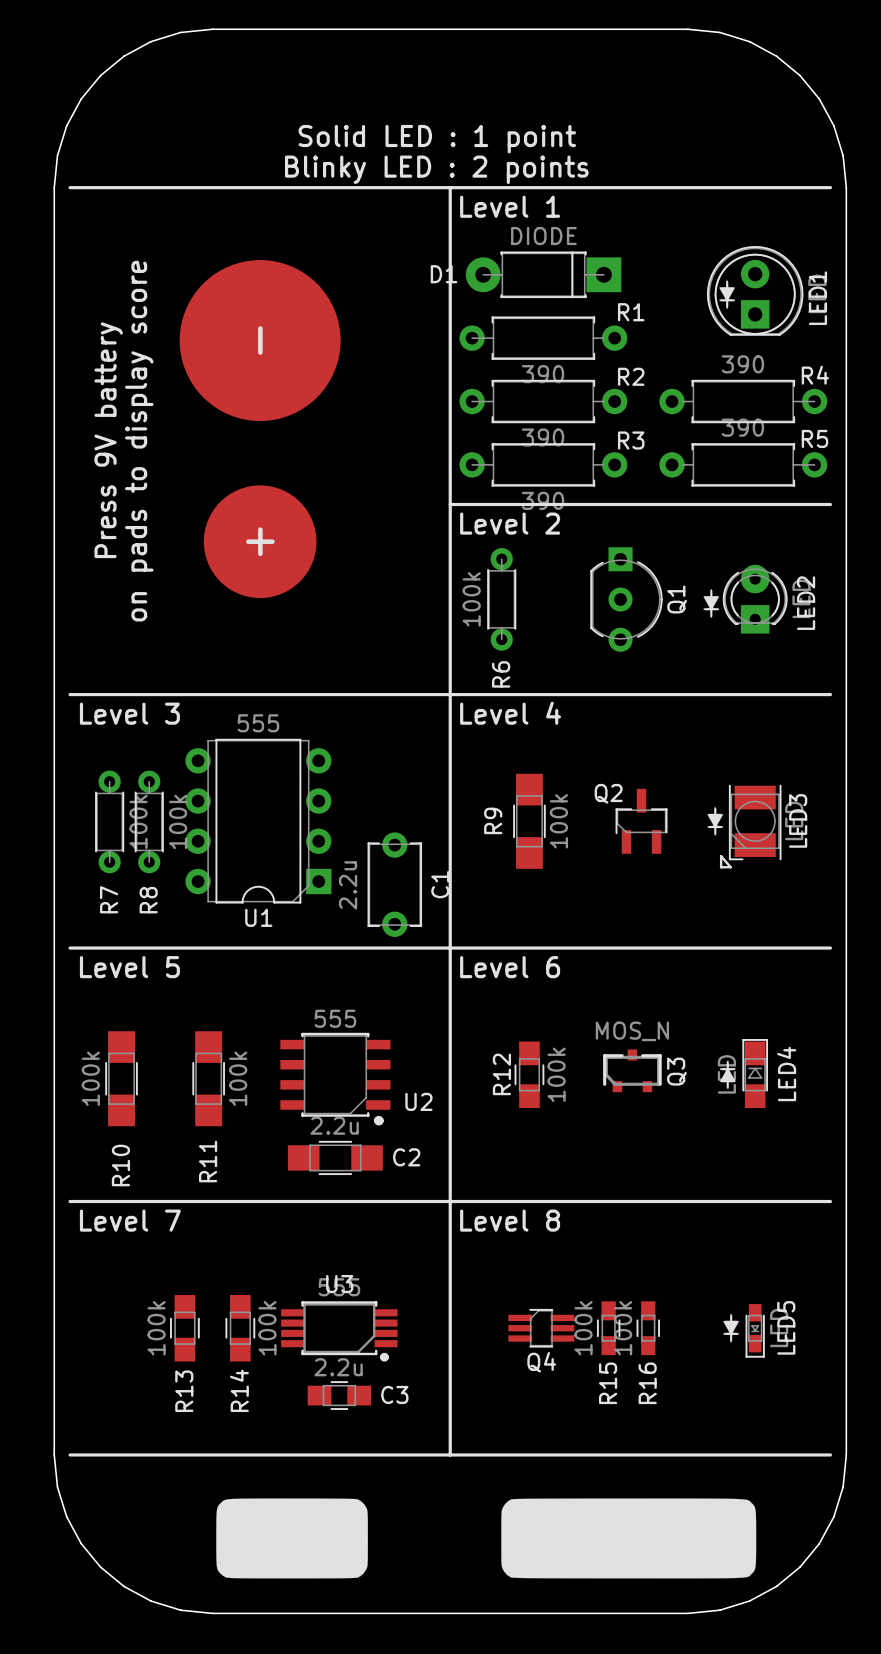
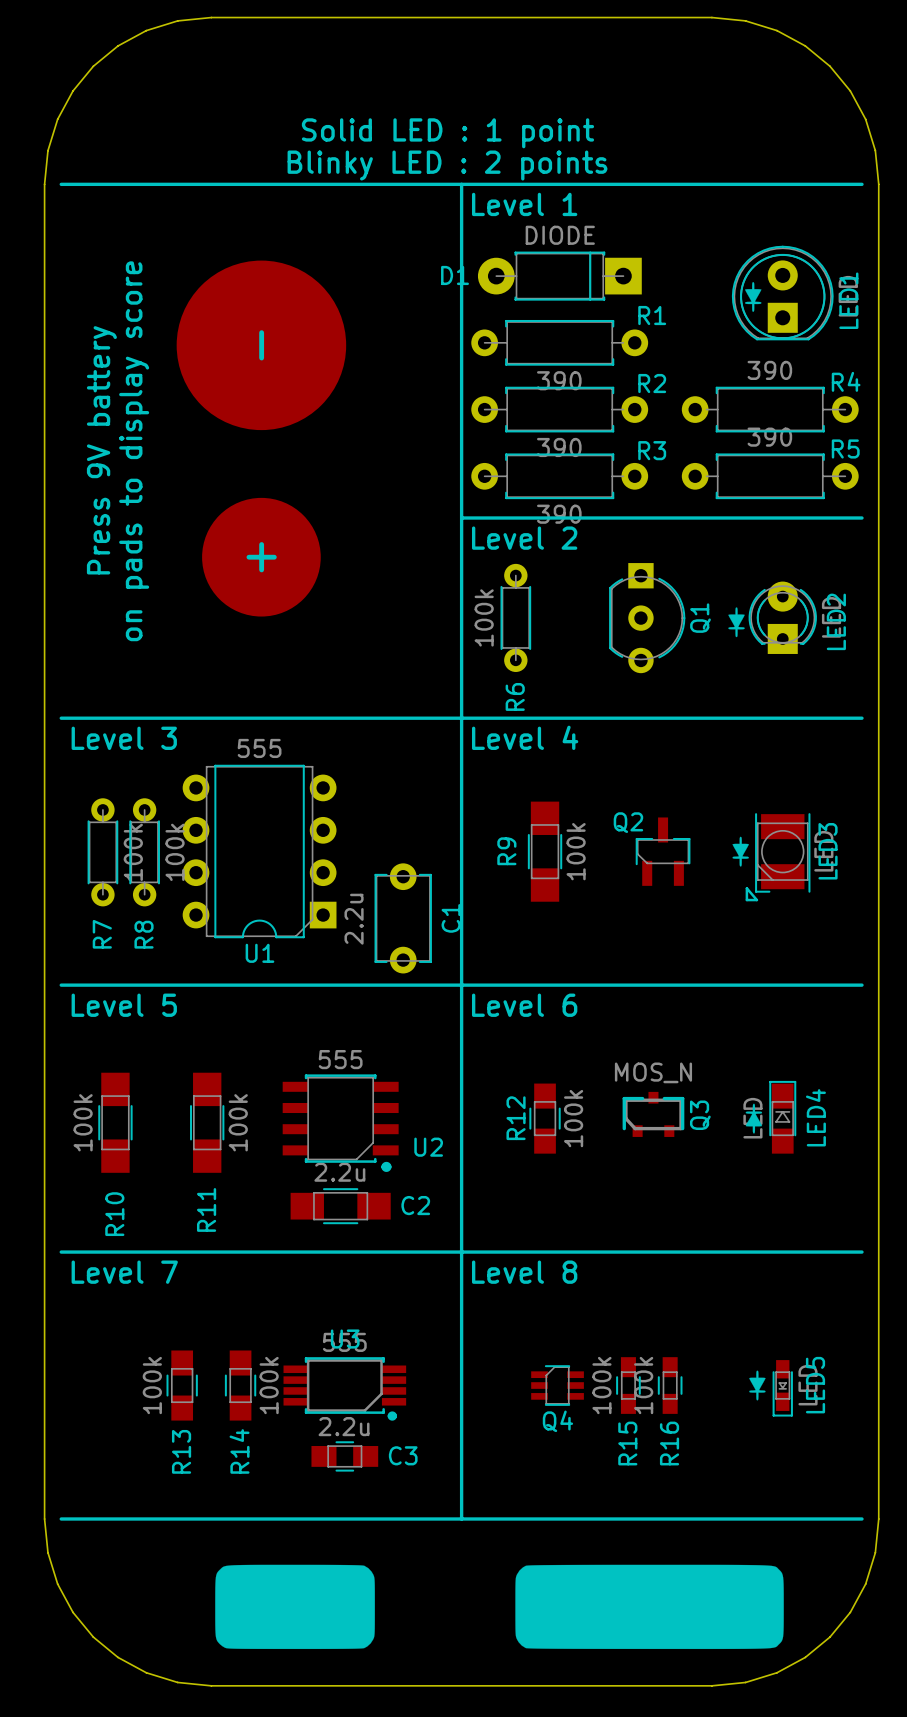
Q4 footprint: [508, 1308, 575, 1348] -> [531, 1365, 584, 1406]

